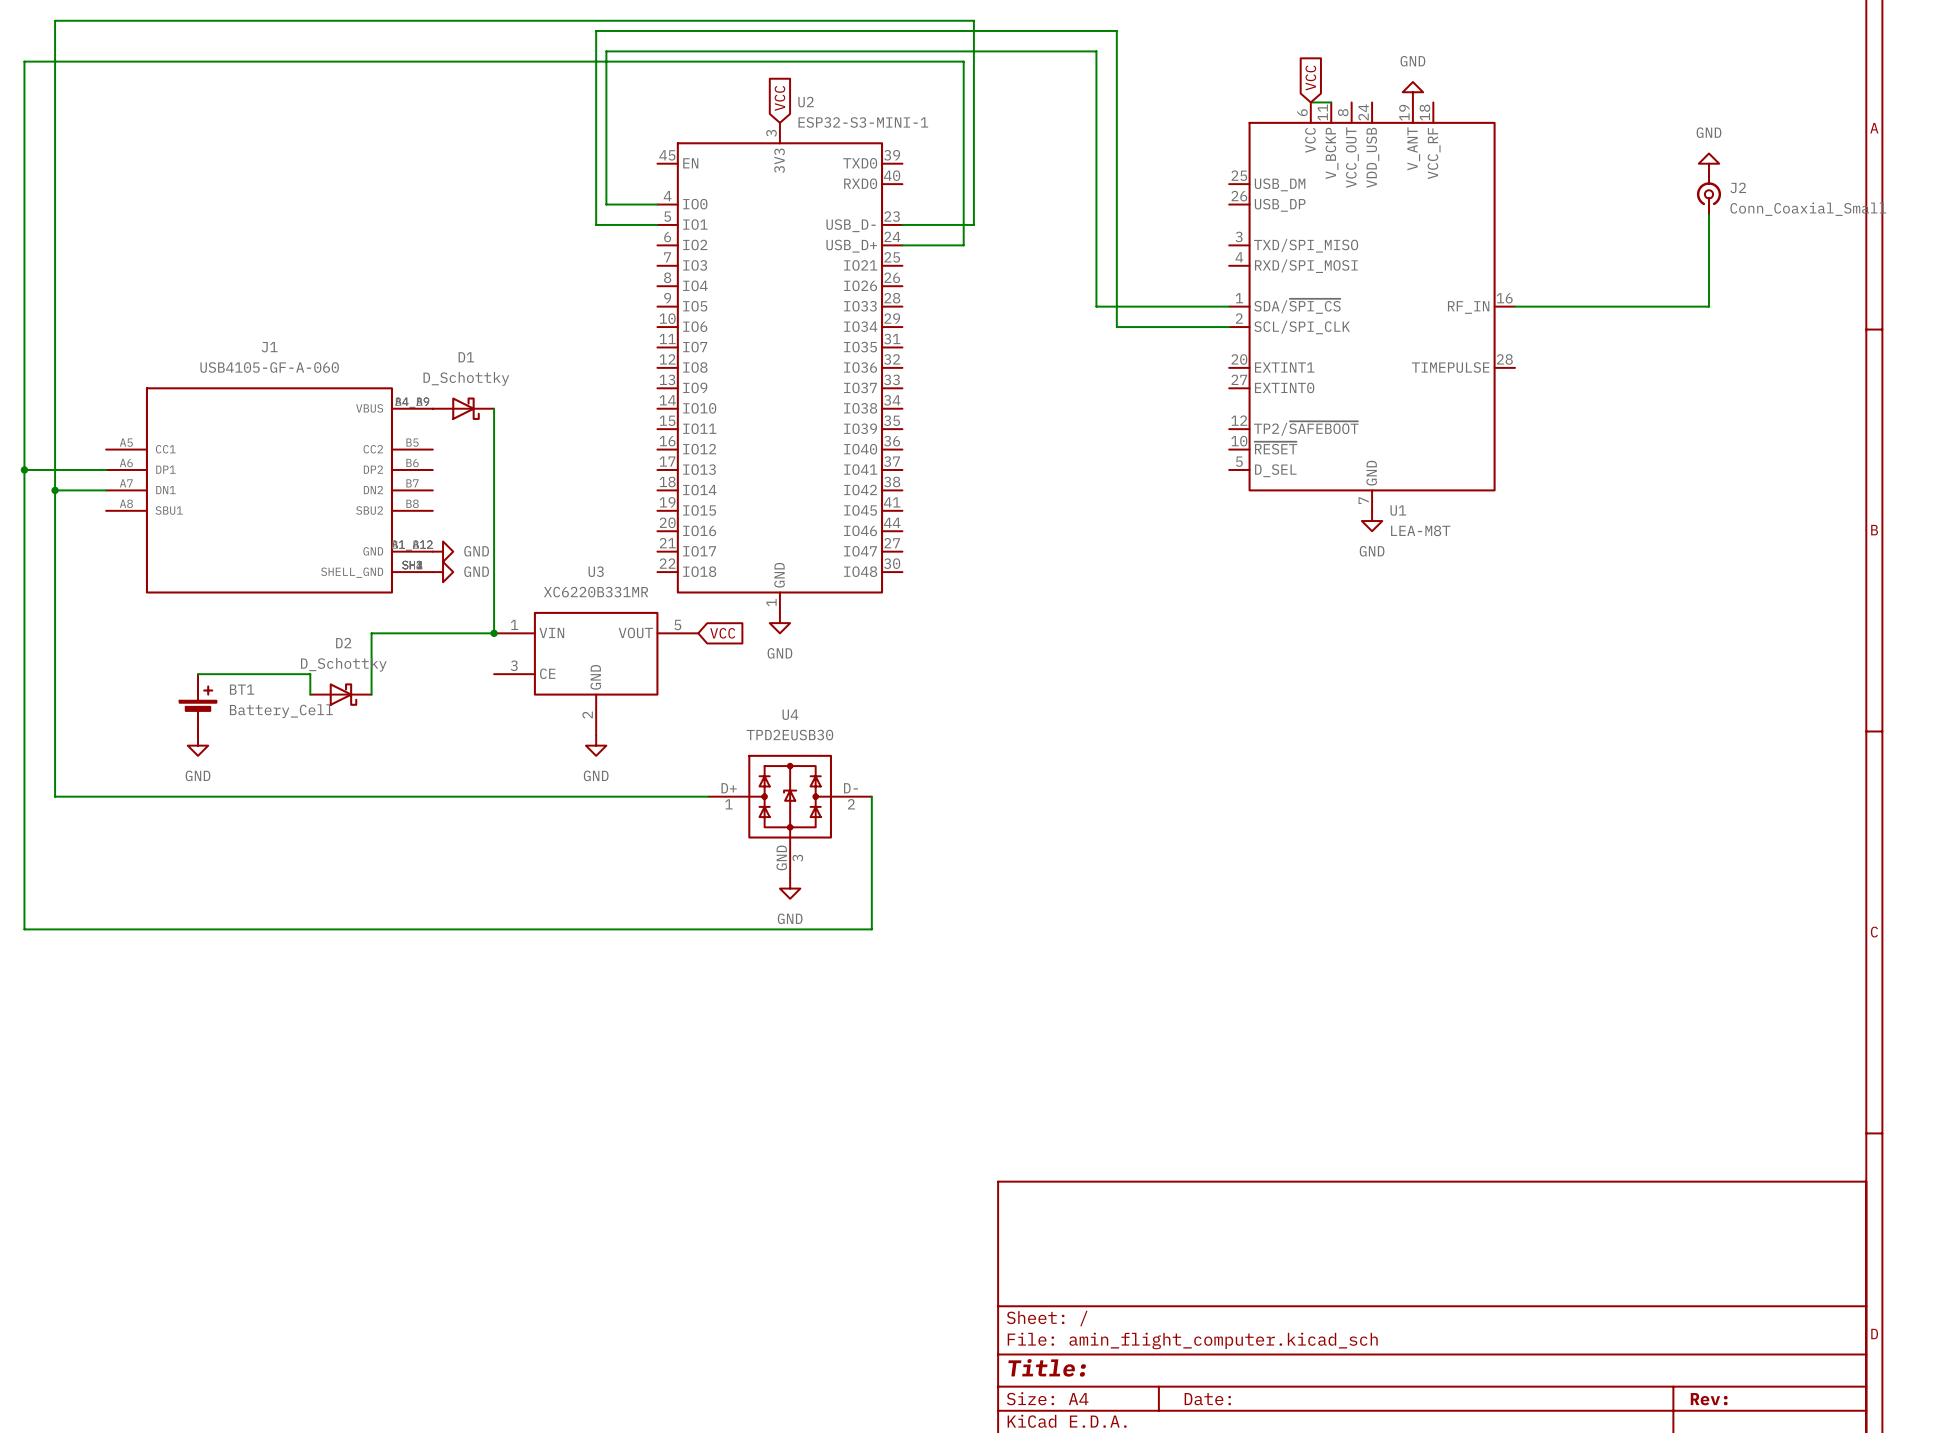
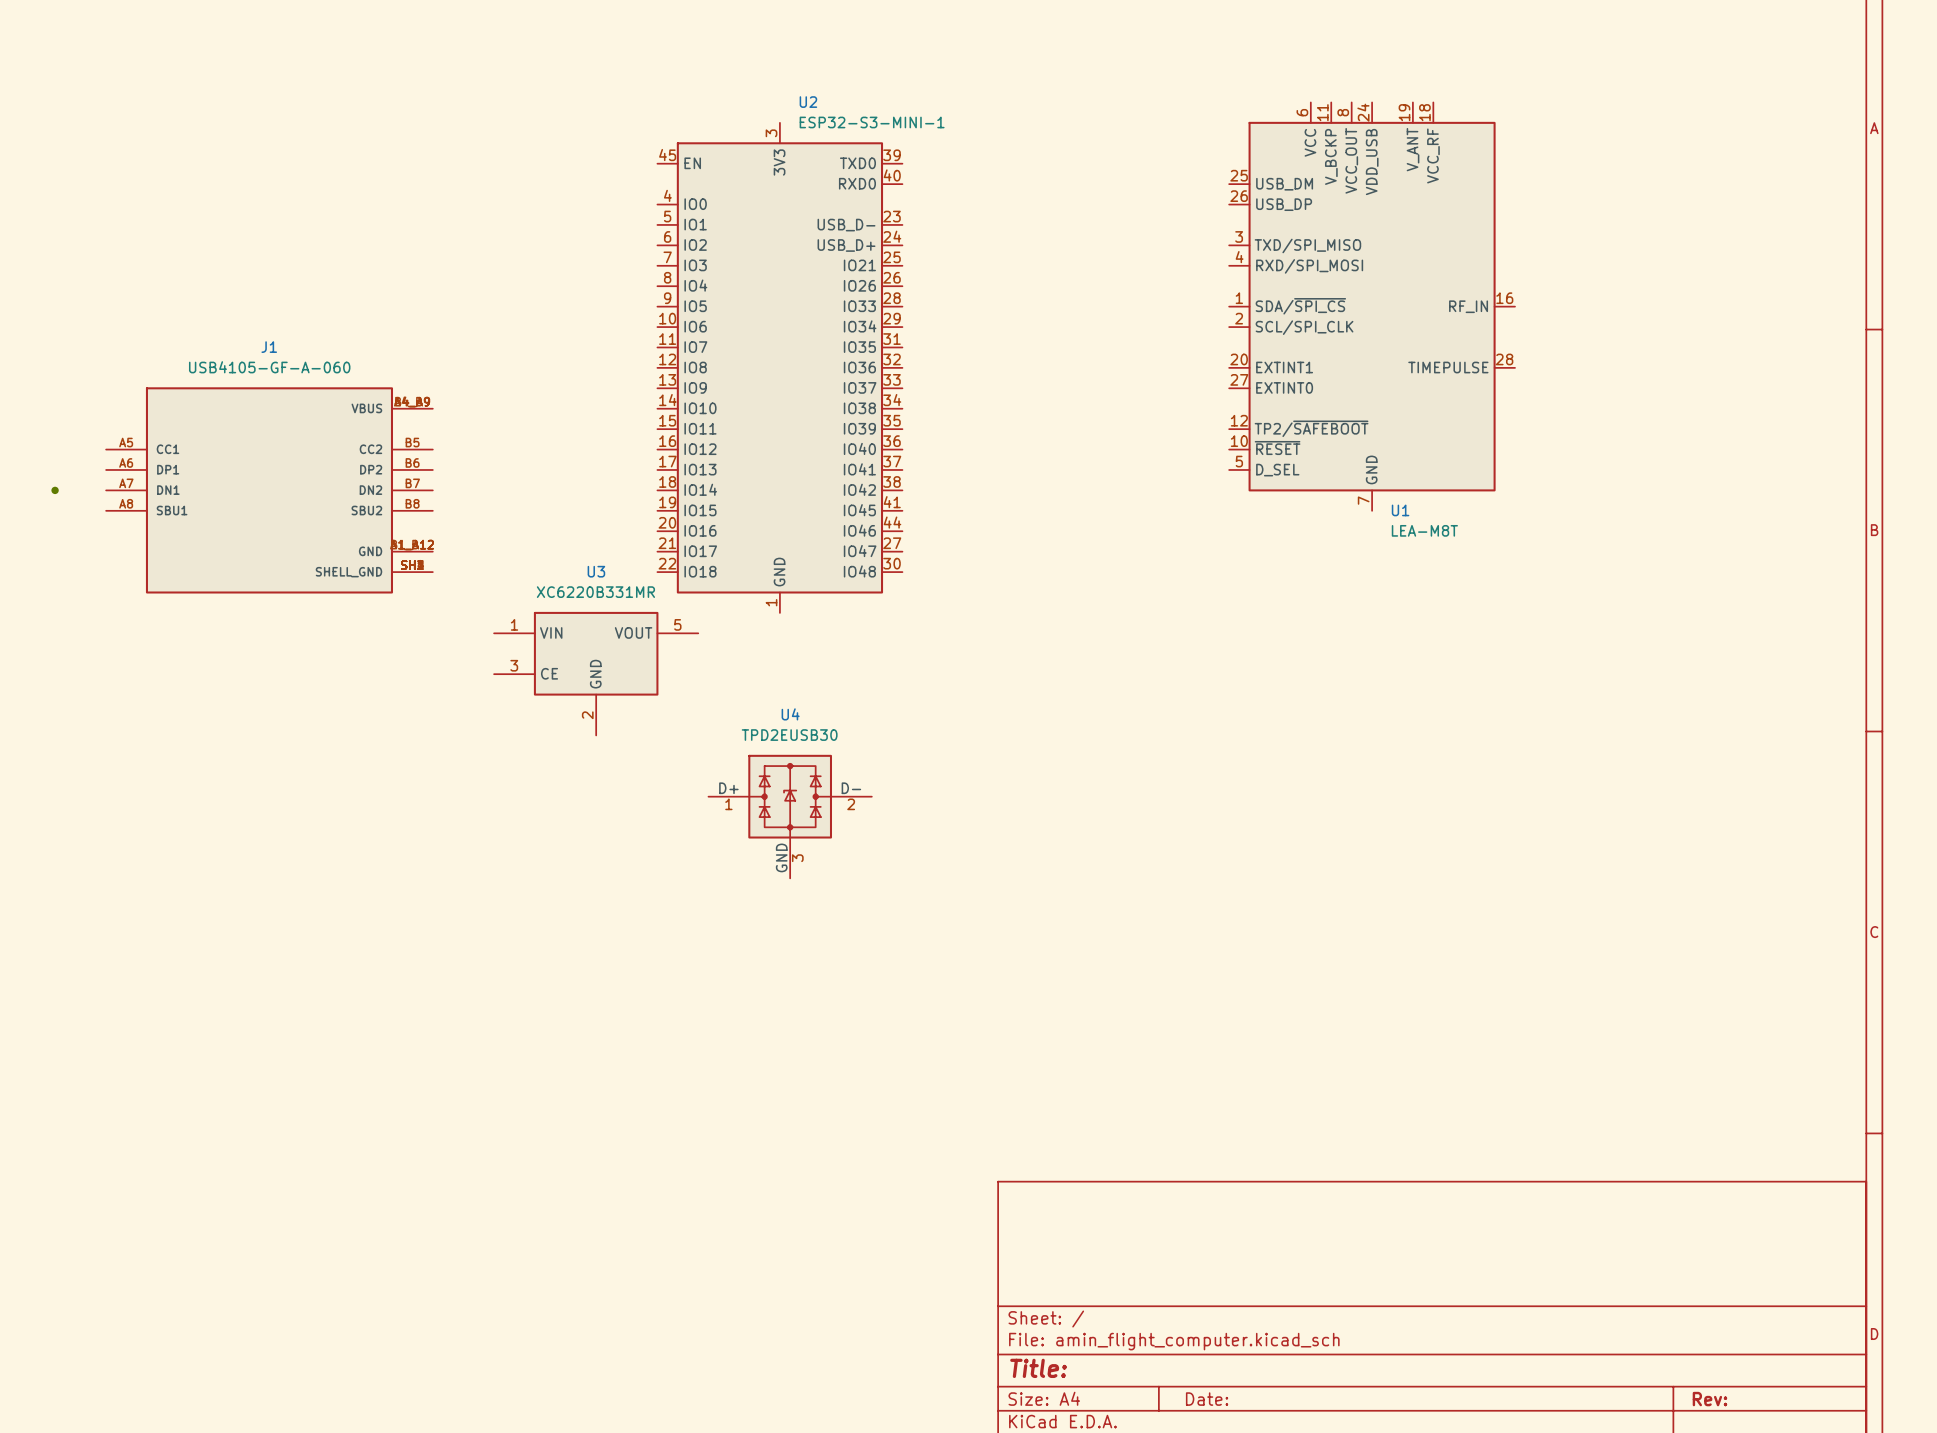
global label: VCC (1310, 77) -> none
power symbol: GND (1412, 92) -> none
global label: VCC (779, 98) -> none
wire: (1310, 102) (1331, 102) -> none
power symbol: GND (1708, 163) -> none
J2: Conn_Coaxial_Small (1708, 194) -> none
wire: (657, 204) (606, 204) (606, 51) (1096, 51) (1096, 306) (1229, 306) -> none
wire: (1708, 214) (1708, 306) (1515, 306) -> none
wire: (657, 224) (596, 224) (596, 30) (1116, 30) (1116, 327) (1229, 327) -> none
wire: (902, 224) (973, 224) (973, 20) (55, 20) (55, 796) (708, 796) -> none
wire: (902, 245) (963, 245) (963, 61) (24, 61) (24, 929) (871, 929) (871, 796) -> none
D1: D_Schottky (463, 408) -> none
wire: (494, 408) (494, 633) (371, 633) (371, 694) -> none
wire: (24, 469) (106, 469) -> none
junction: (24, 469) -> none
wire: (55, 490) (106, 490) -> none
power symbol: GND (1372, 521) -> none
power symbol: GND (443, 551) -> none
power symbol: GND (443, 572) -> none
power symbol: GND (779, 623) -> none
junction: (494, 633) -> none
global label: VCC (722, 633) -> none
wire: (198, 674) (310, 674) (310, 694) -> none
D2: D_Schottky (340, 694) -> none
BT1: Battery_Cell (198, 704) -> none
power symbol: GND (198, 745) -> none
power symbol: GND (596, 745) -> none
power symbol: GND (790, 888) -> none

